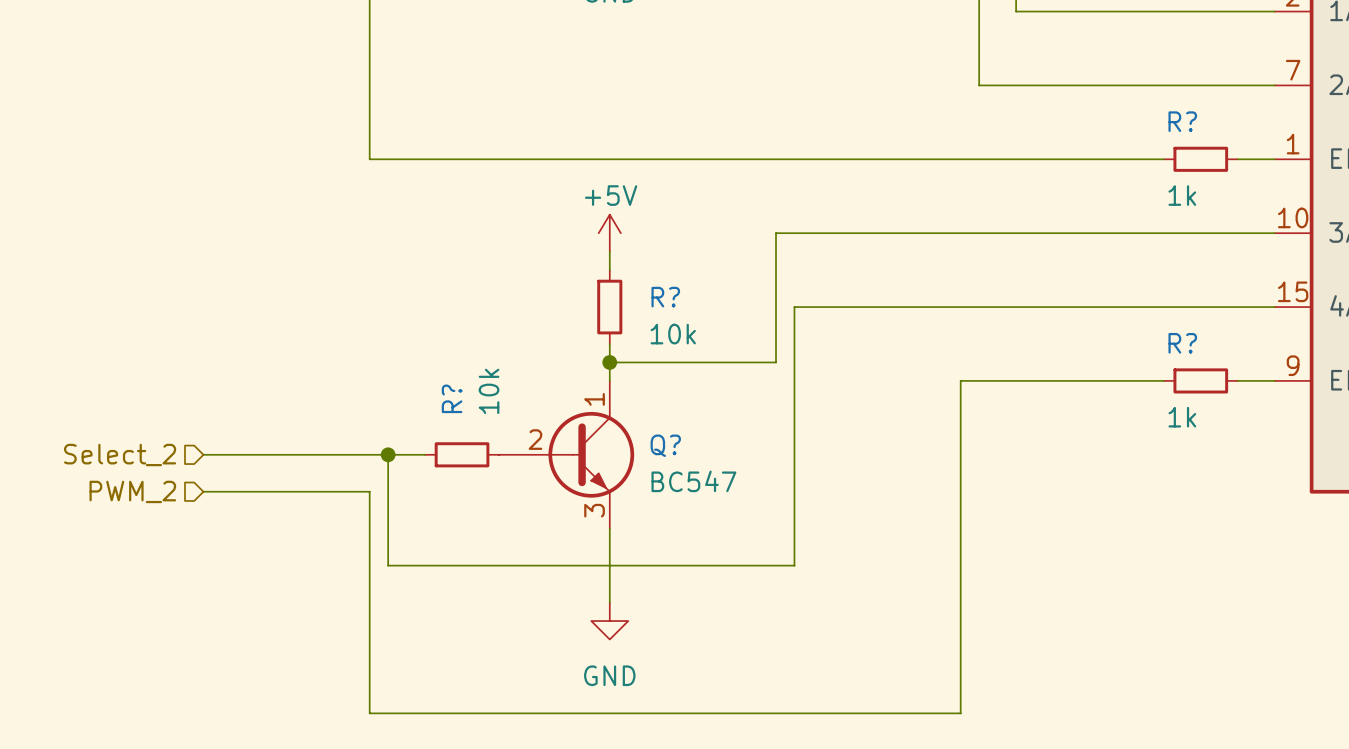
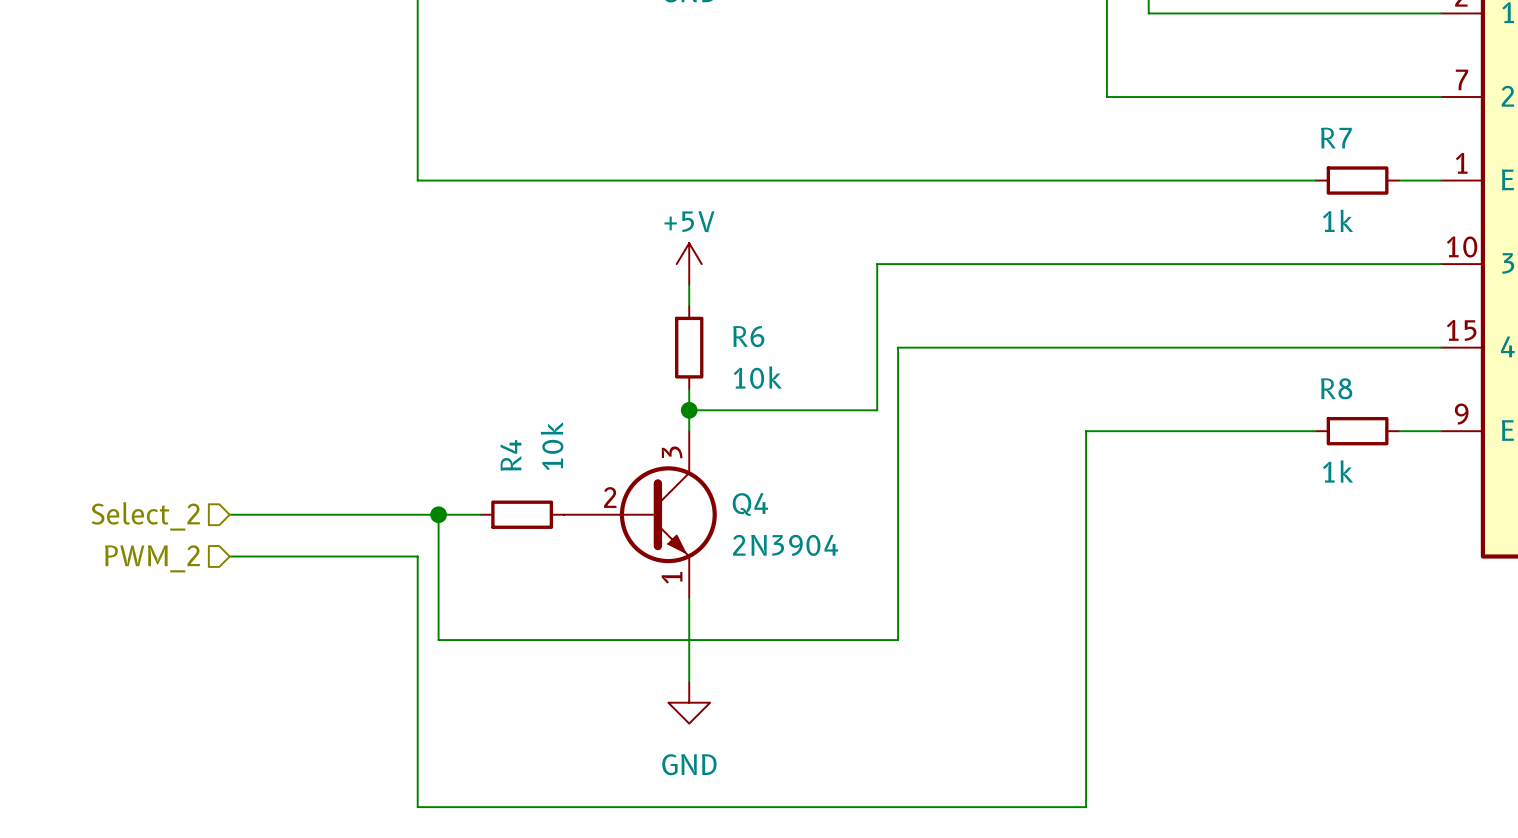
R? name: R? (1182, 121) -> R7 (1336, 138)
R? name: R? (665, 297) -> R6 (748, 336)
R? name: R? (1182, 343) -> R8 (1336, 388)
R? name: R? (452, 398) -> R4 (510, 455)
Q?: BC547 (566, 454) -> none
Q4: none -> 2N3904 (640, 514)

